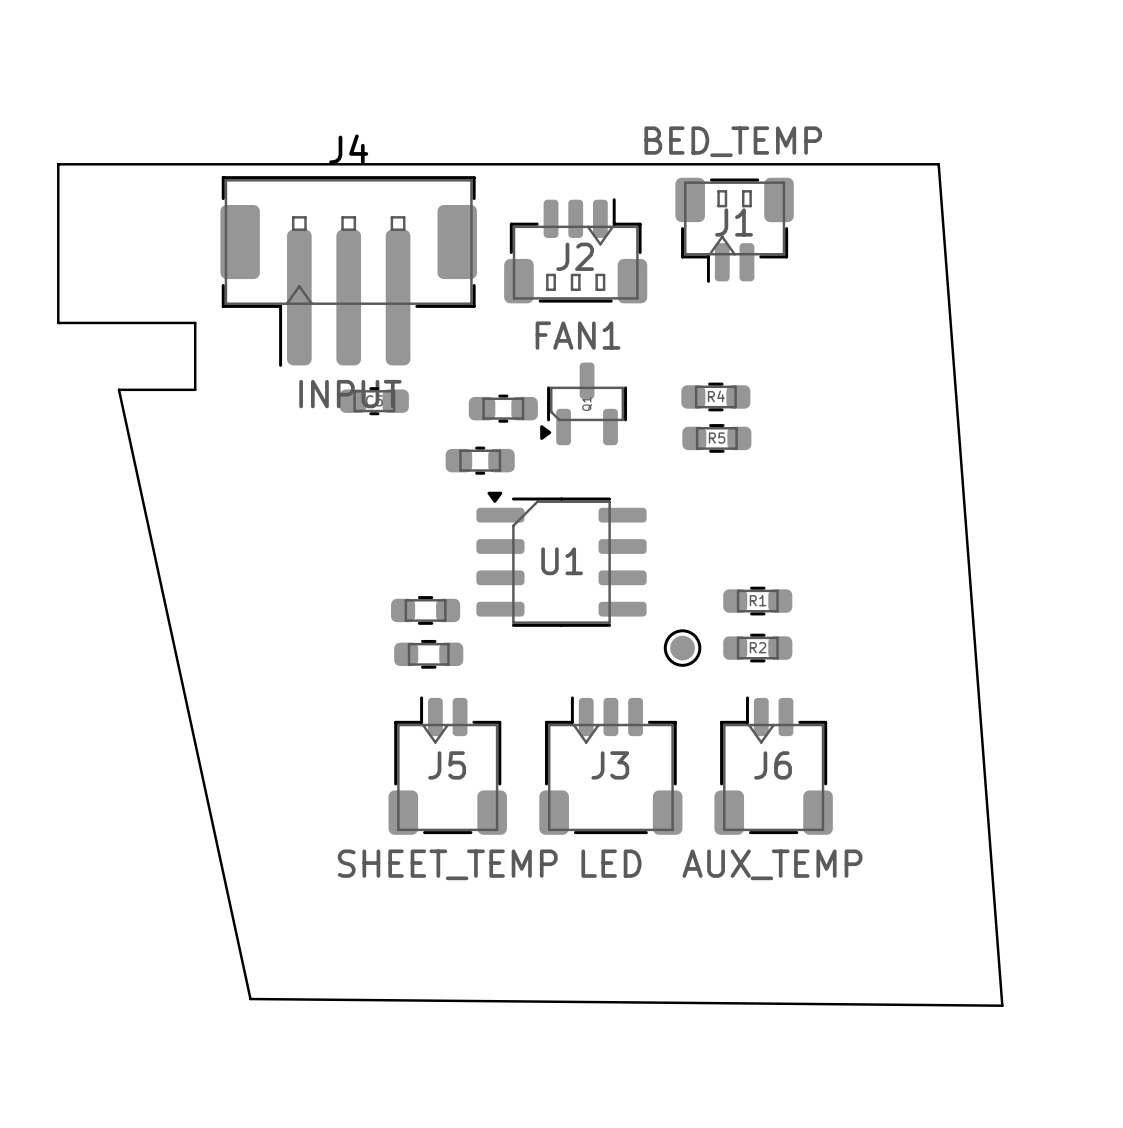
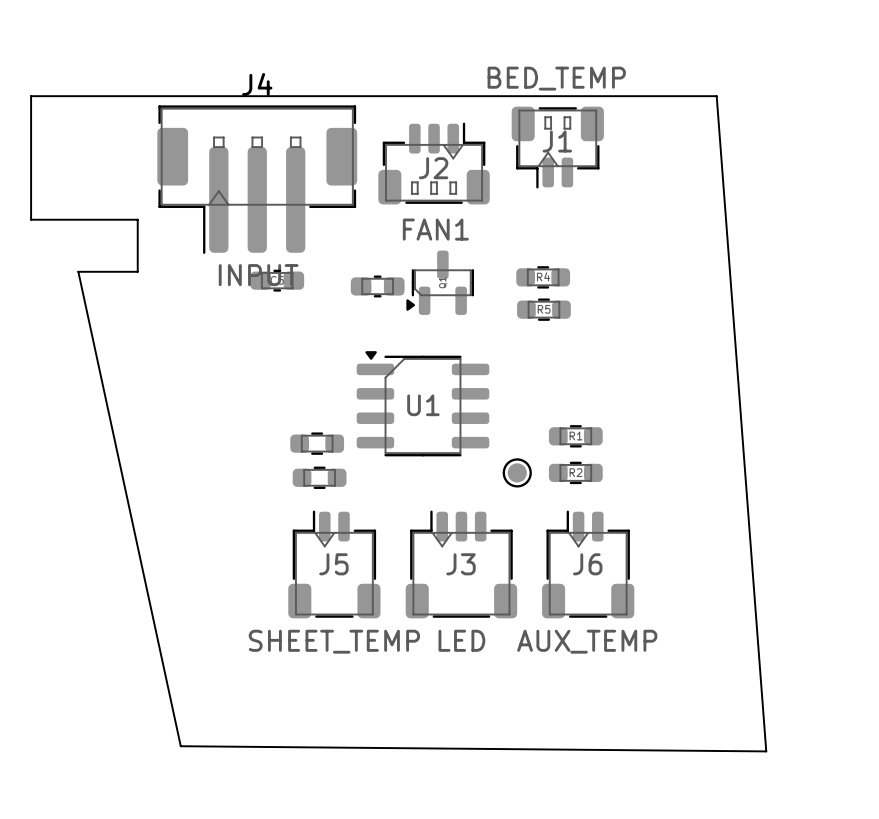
part: (480, 460) -> none

